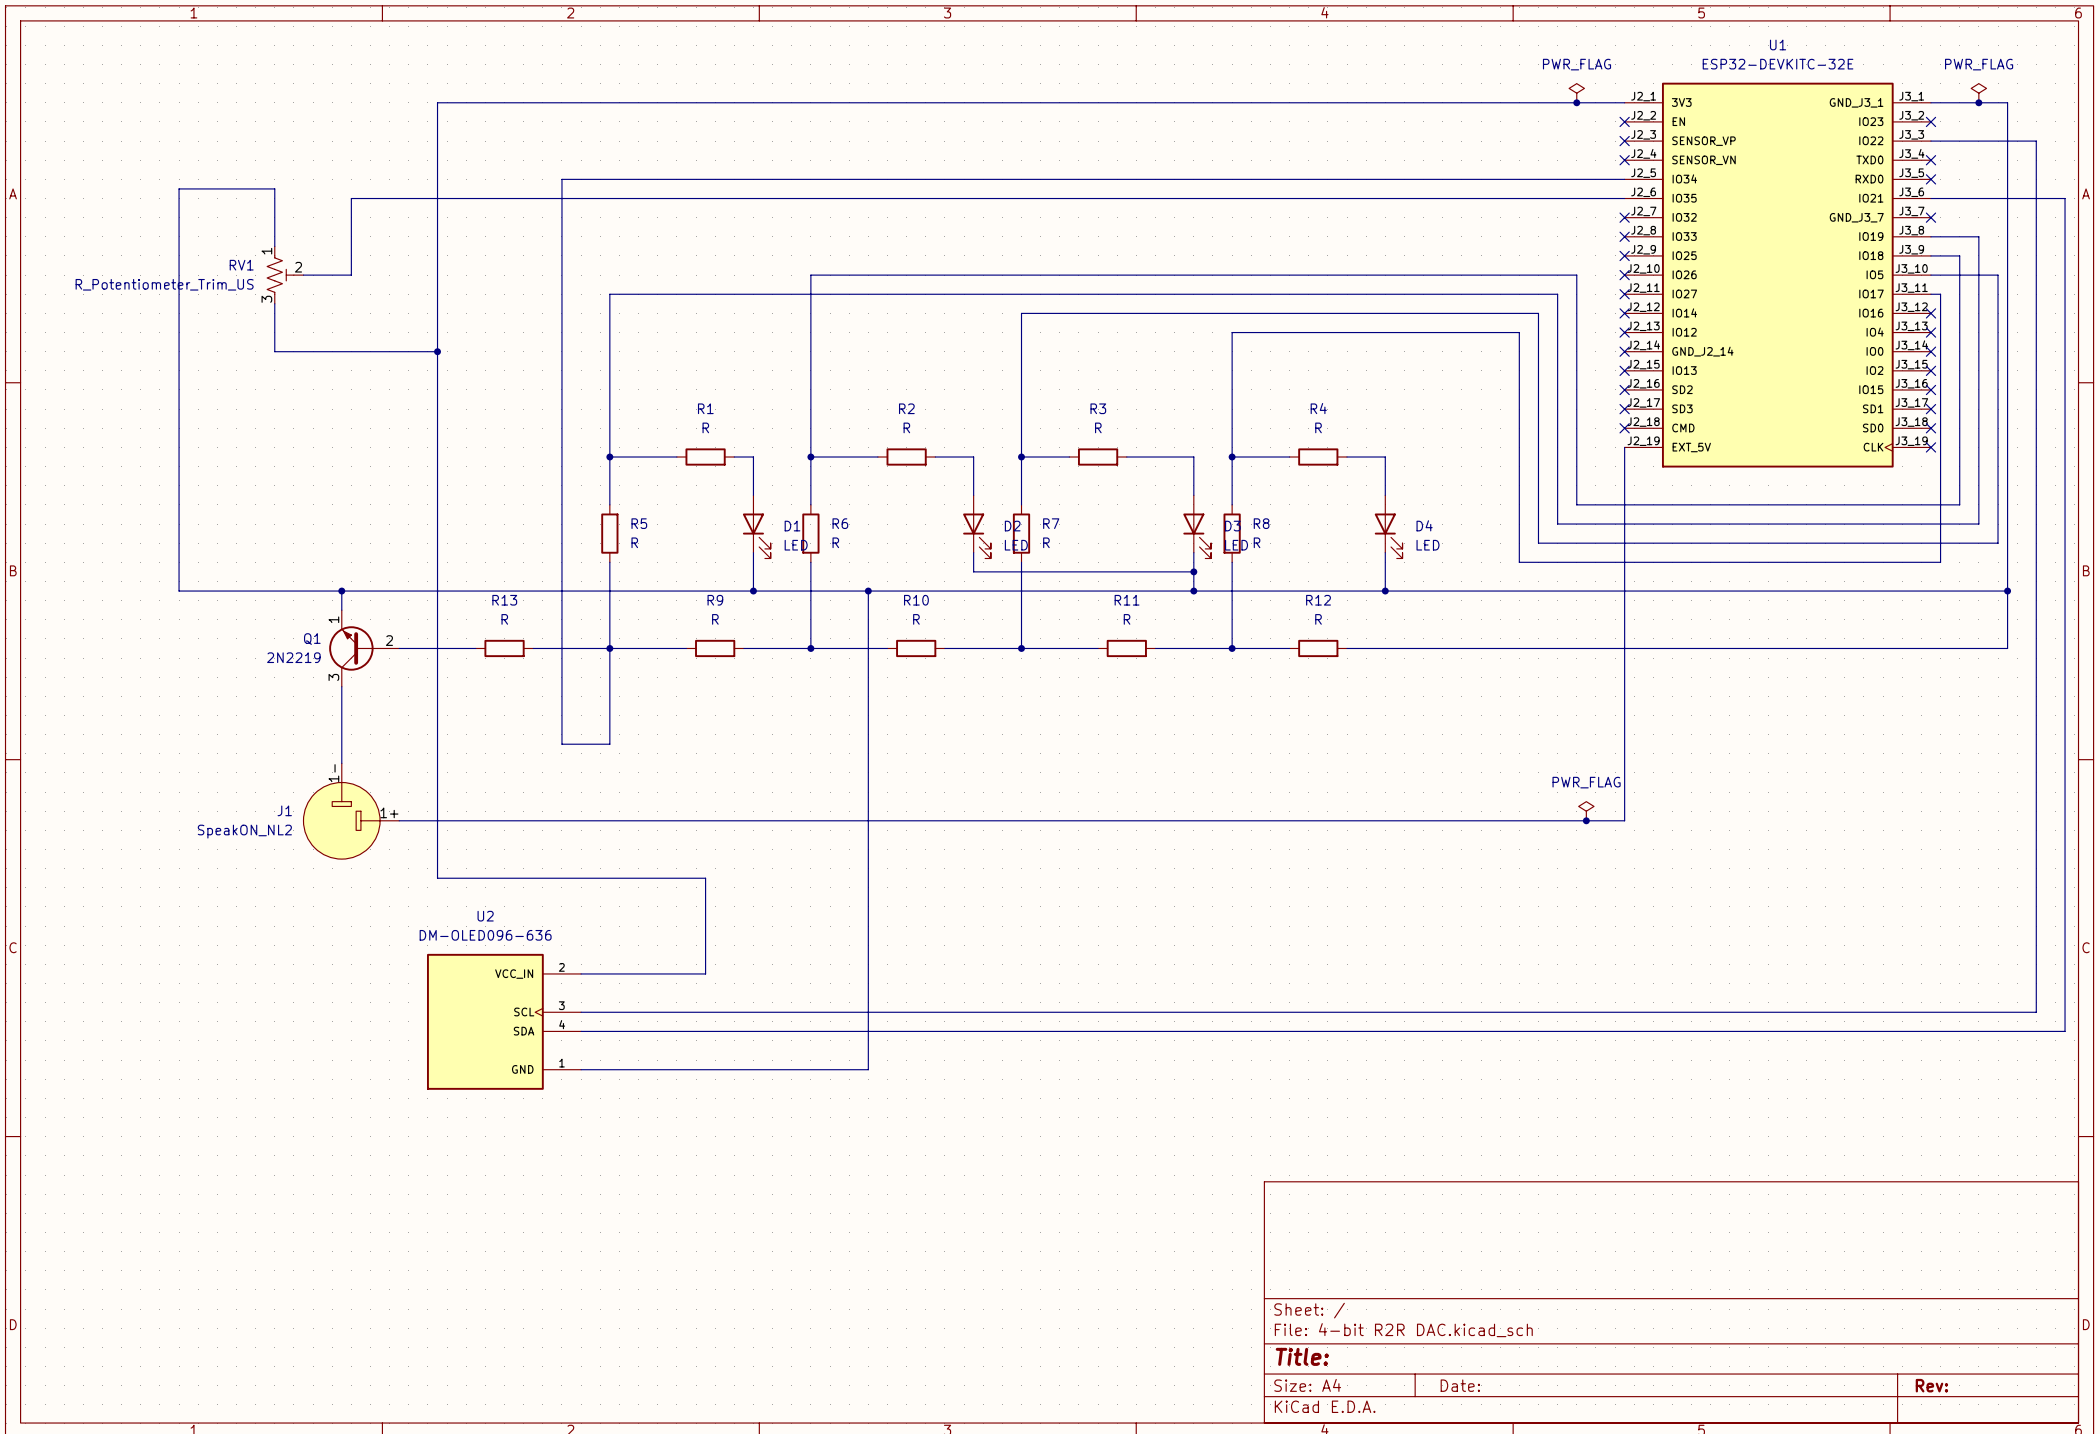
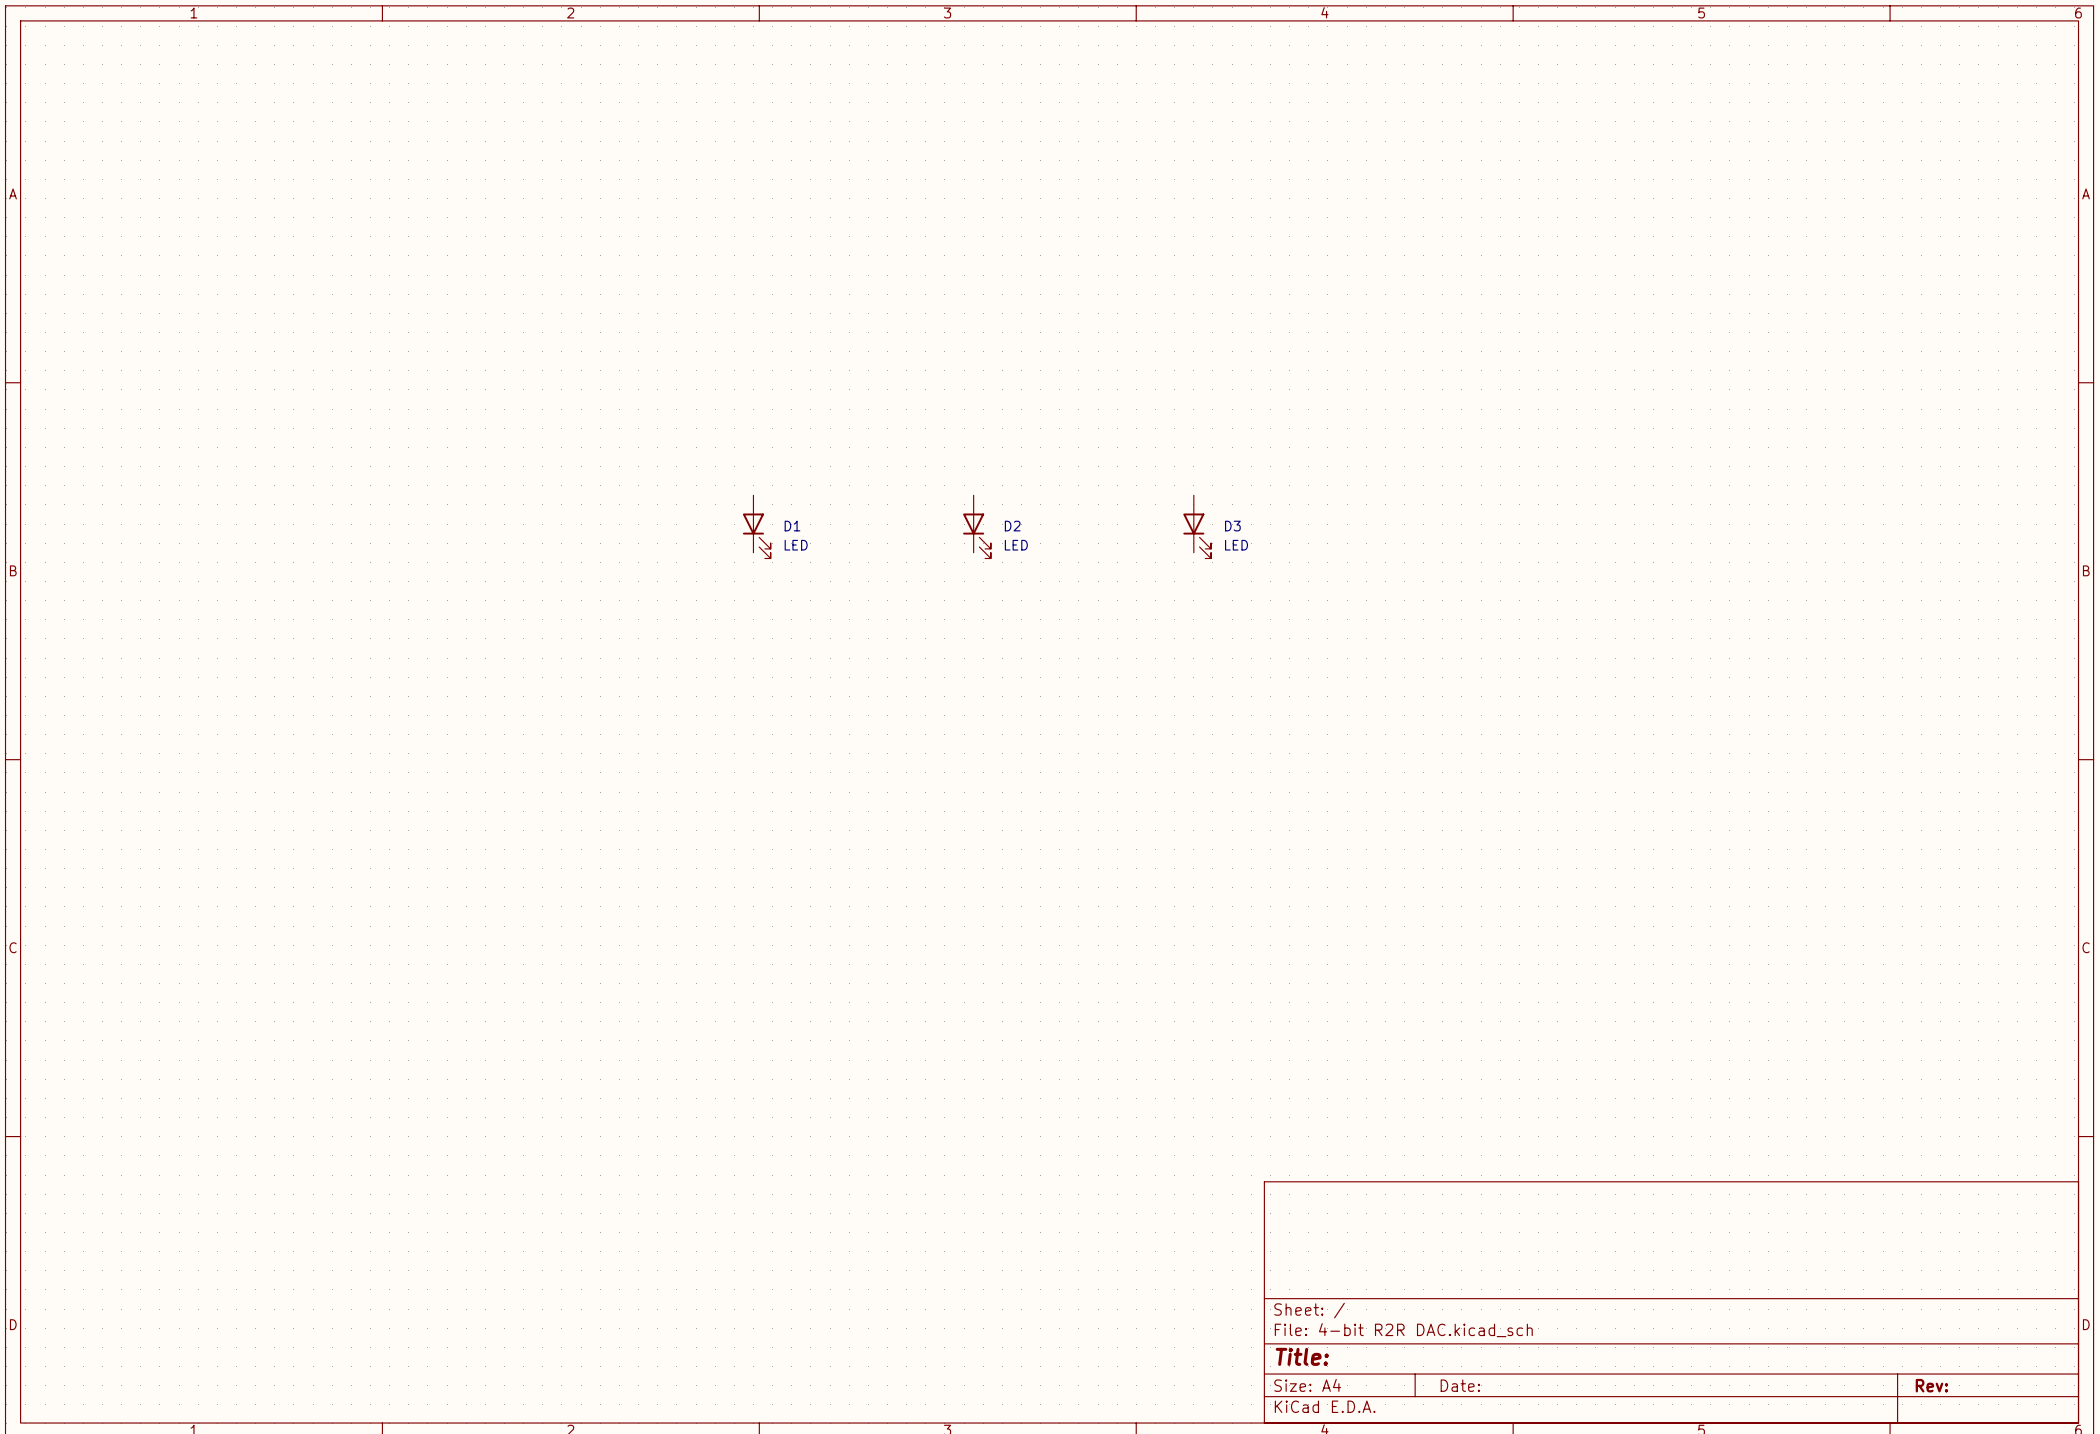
power symbol: PWR_FLAG (1576, 93) -> none
power symbol: PWR_FLAG (1978, 93) -> none
junction: (1576, 102) -> none
wire: (1624, 102) (437, 102) (437, 878) (705, 878) (705, 973) (581, 973) -> none
wire: (1930, 102) (2007, 102) (2007, 648) (1347, 648) -> none
junction: (1978, 102) -> none
no-connect mark: (1624, 121) -> none
no-connect mark: (1930, 121) -> none
no-connect mark: (1624, 141) -> none
wire: (1930, 141) (2036, 141) (2036, 1012) (581, 1012) -> none
no-connect mark: (1624, 160) -> none
no-connect mark: (1930, 160) -> none
wire: (1624, 179) (561, 179) (561, 744) (609, 744) (609, 562) -> none
no-connect mark: (1930, 179) -> none
wire: (1624, 198) (351, 198) (351, 275) (303, 275) -> none
wire: (1930, 198) (2065, 198) (2065, 1031) (581, 1031) -> none
no-connect mark: (1624, 217) -> none
no-connect mark: (1930, 217) -> none
no-connect mark: (1624, 236) -> none
wire: (1930, 236) (1978, 236) (1978, 524) (1557, 524) (1557, 294) (609, 294) (609, 504) -> none
wire: (274, 246) (274, 188) (179, 188) (179, 591) (2007, 591) -> none
no-connect mark: (1624, 255) -> none
wire: (1930, 255) (1959, 255) (1959, 504) (1576, 504) (1576, 275) (810, 275) (810, 504) -> none
RV1: R_Potentiometer_Trim_US (285, 275) -> none
no-connect mark: (1624, 275) -> none
U1: ESP32-DEVKITC-32E (1777, 275) -> none
wire: (1930, 275) (1998, 275) (1998, 543) (1538, 543) (1538, 313) (1021, 313) (1021, 504) -> none
no-connect mark: (1624, 294) -> none
wire: (1930, 294) (1940, 294) (1940, 562) (1519, 562) (1519, 332) (1232, 332) (1232, 504) -> none
wire: (274, 303) (274, 351) (437, 351) -> none
no-connect mark: (1624, 313) -> none
no-connect mark: (1930, 313) -> none
no-connect mark: (1624, 332) -> none
no-connect mark: (1930, 332) -> none
junction: (437, 351) -> none
no-connect mark: (1624, 351) -> none
no-connect mark: (1930, 351) -> none
no-connect mark: (1624, 370) -> none
no-connect mark: (1930, 370) -> none
no-connect mark: (1624, 389) -> none
no-connect mark: (1930, 389) -> none
no-connect mark: (1624, 409) -> none
no-connect mark: (1930, 409) -> none
no-connect mark: (1624, 428) -> none
no-connect mark: (1930, 428) -> none
wire: (1624, 447) (1624, 820) (399, 820) -> none
no-connect mark: (1930, 447) -> none
wire: (609, 457) (676, 457) -> none
junction: (609, 457) -> none
R1: R (705, 457) -> none
wire: (734, 457) (753, 457) (753, 495) -> none
wire: (810, 457) (877, 457) -> none
junction: (810, 457) -> none
R2: R (906, 457) -> none
wire: (935, 457) (973, 457) (973, 495) -> none
wire: (1021, 457) (1069, 457) -> none
junction: (1021, 457) -> none
R3: R (1098, 457) -> none
wire: (1126, 457) (1193, 457) (1193, 495) -> none
wire: (1232, 457) (1289, 457) -> none
junction: (1232, 457) -> none
R4: R (1318, 457) -> none
wire: (1347, 457) (1385, 457) (1385, 495) -> none
D4: LED (1388, 526) -> none
R5: R (609, 533) -> none
R6: R (810, 533) -> none
R7: R (1021, 533) -> none
R8: R (1232, 533) -> none
wire: (753, 552) (753, 591) -> none
wire: (973, 552) (973, 571) (1193, 571) -> none
wire: (1193, 552) (1193, 591) -> none
wire: (1385, 552) (1385, 591) -> none
wire: (810, 562) (810, 648) -> none
wire: (1021, 562) (1021, 648) -> none
wire: (1232, 562) (1232, 648) -> none
junction: (1193, 571) -> none
wire: (341, 591) (341, 610) -> none
junction: (341, 591) -> none
junction: (753, 591) -> none
wire: (868, 591) (868, 1069) (581, 1069) -> none
junction: (868, 591) -> none
junction: (1193, 591) -> none
junction: (1385, 591) -> none
junction: (2007, 591) -> none
Q1: 2N2219 (364, 648) -> none
wire: (399, 648) (475, 648) -> none
R13: R (504, 648) -> none
wire: (533, 648) (686, 648) -> none
junction: (609, 648) -> none
R9: R (715, 648) -> none
wire: (743, 648) (887, 648) -> none
junction: (810, 648) -> none
R10: R (916, 648) -> none
wire: (944, 648) (1098, 648) -> none
junction: (1021, 648) -> none
R11: R (1126, 648) -> none
wire: (1155, 648) (1289, 648) -> none
junction: (1232, 648) -> none
R12: R (1318, 648) -> none
wire: (341, 686) (341, 763) -> none
J1: SpeakON_NL2 (351, 811) -> none
power symbol: PWR_FLAG (1586, 811) -> none
junction: (1586, 820) -> none
U2: DM-OLED096-636 (504, 1021) -> none

